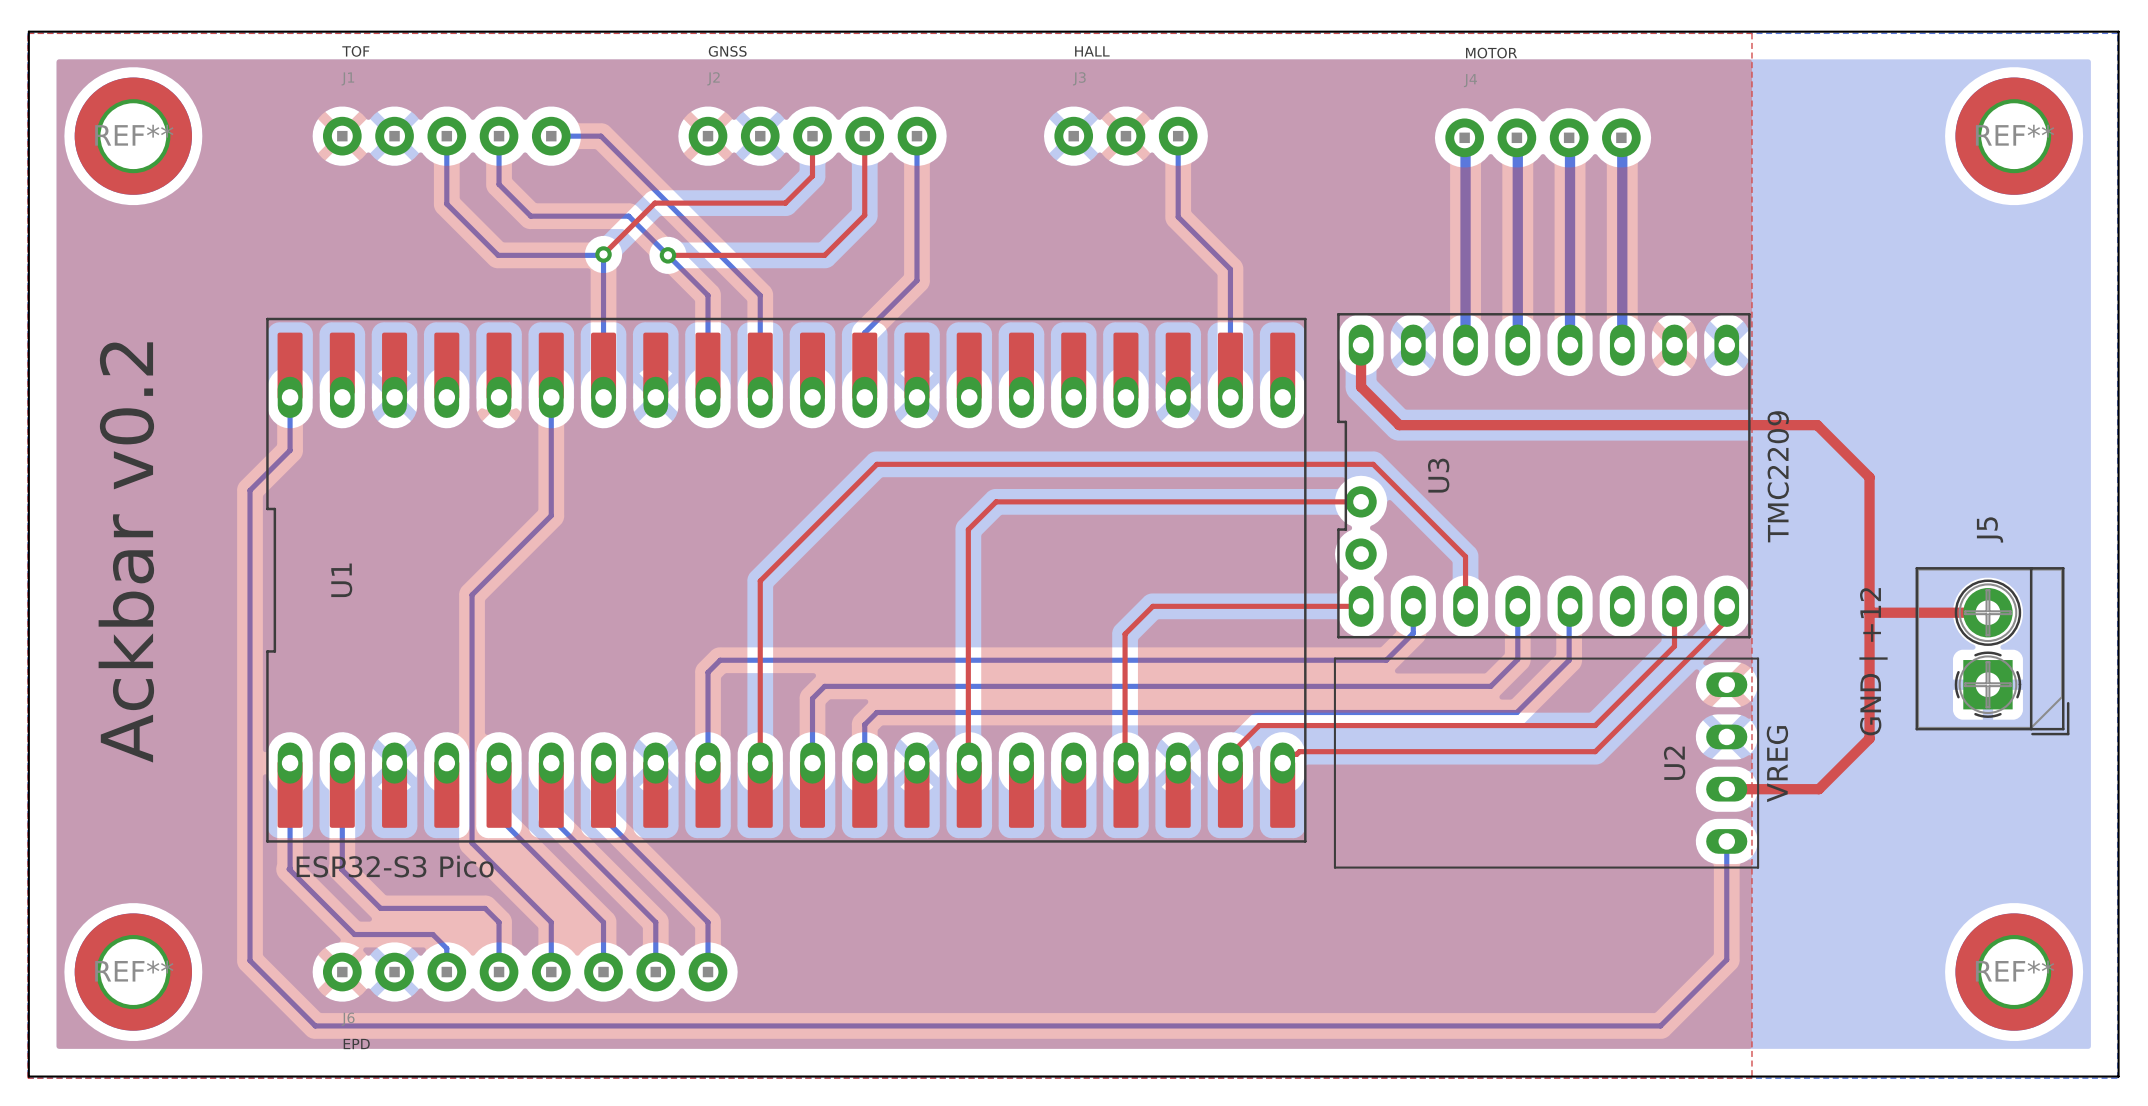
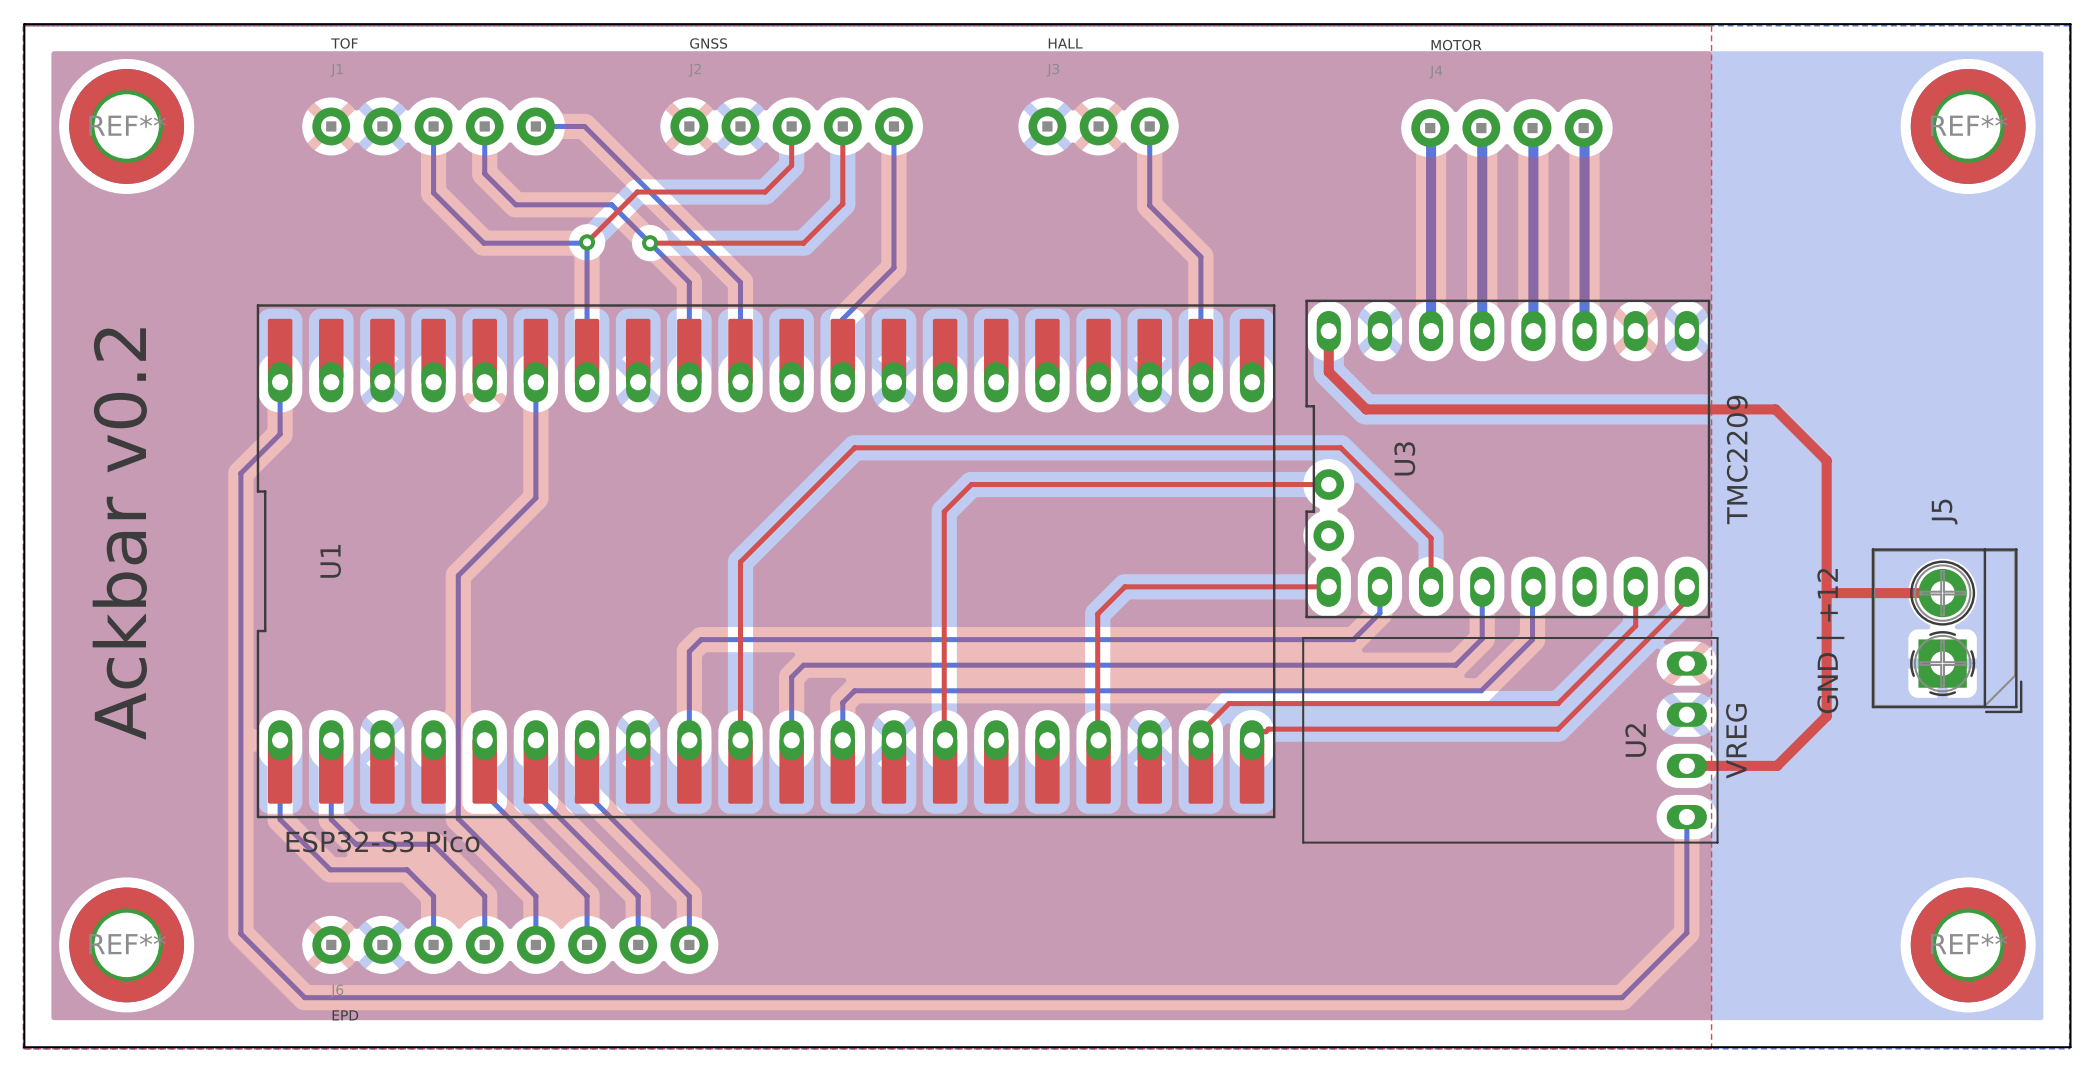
bottom track: (290, 843) (289, 869) (354, 934) (432, 934) (446, 948) -> (280, 819) (330, 869) (407, 869) (433, 896) (433, 921)
bottom track: (342, 843) (341, 869) (380, 908) (485, 908) -> (331, 819) (355, 844) (432, 844) (471, 882)

